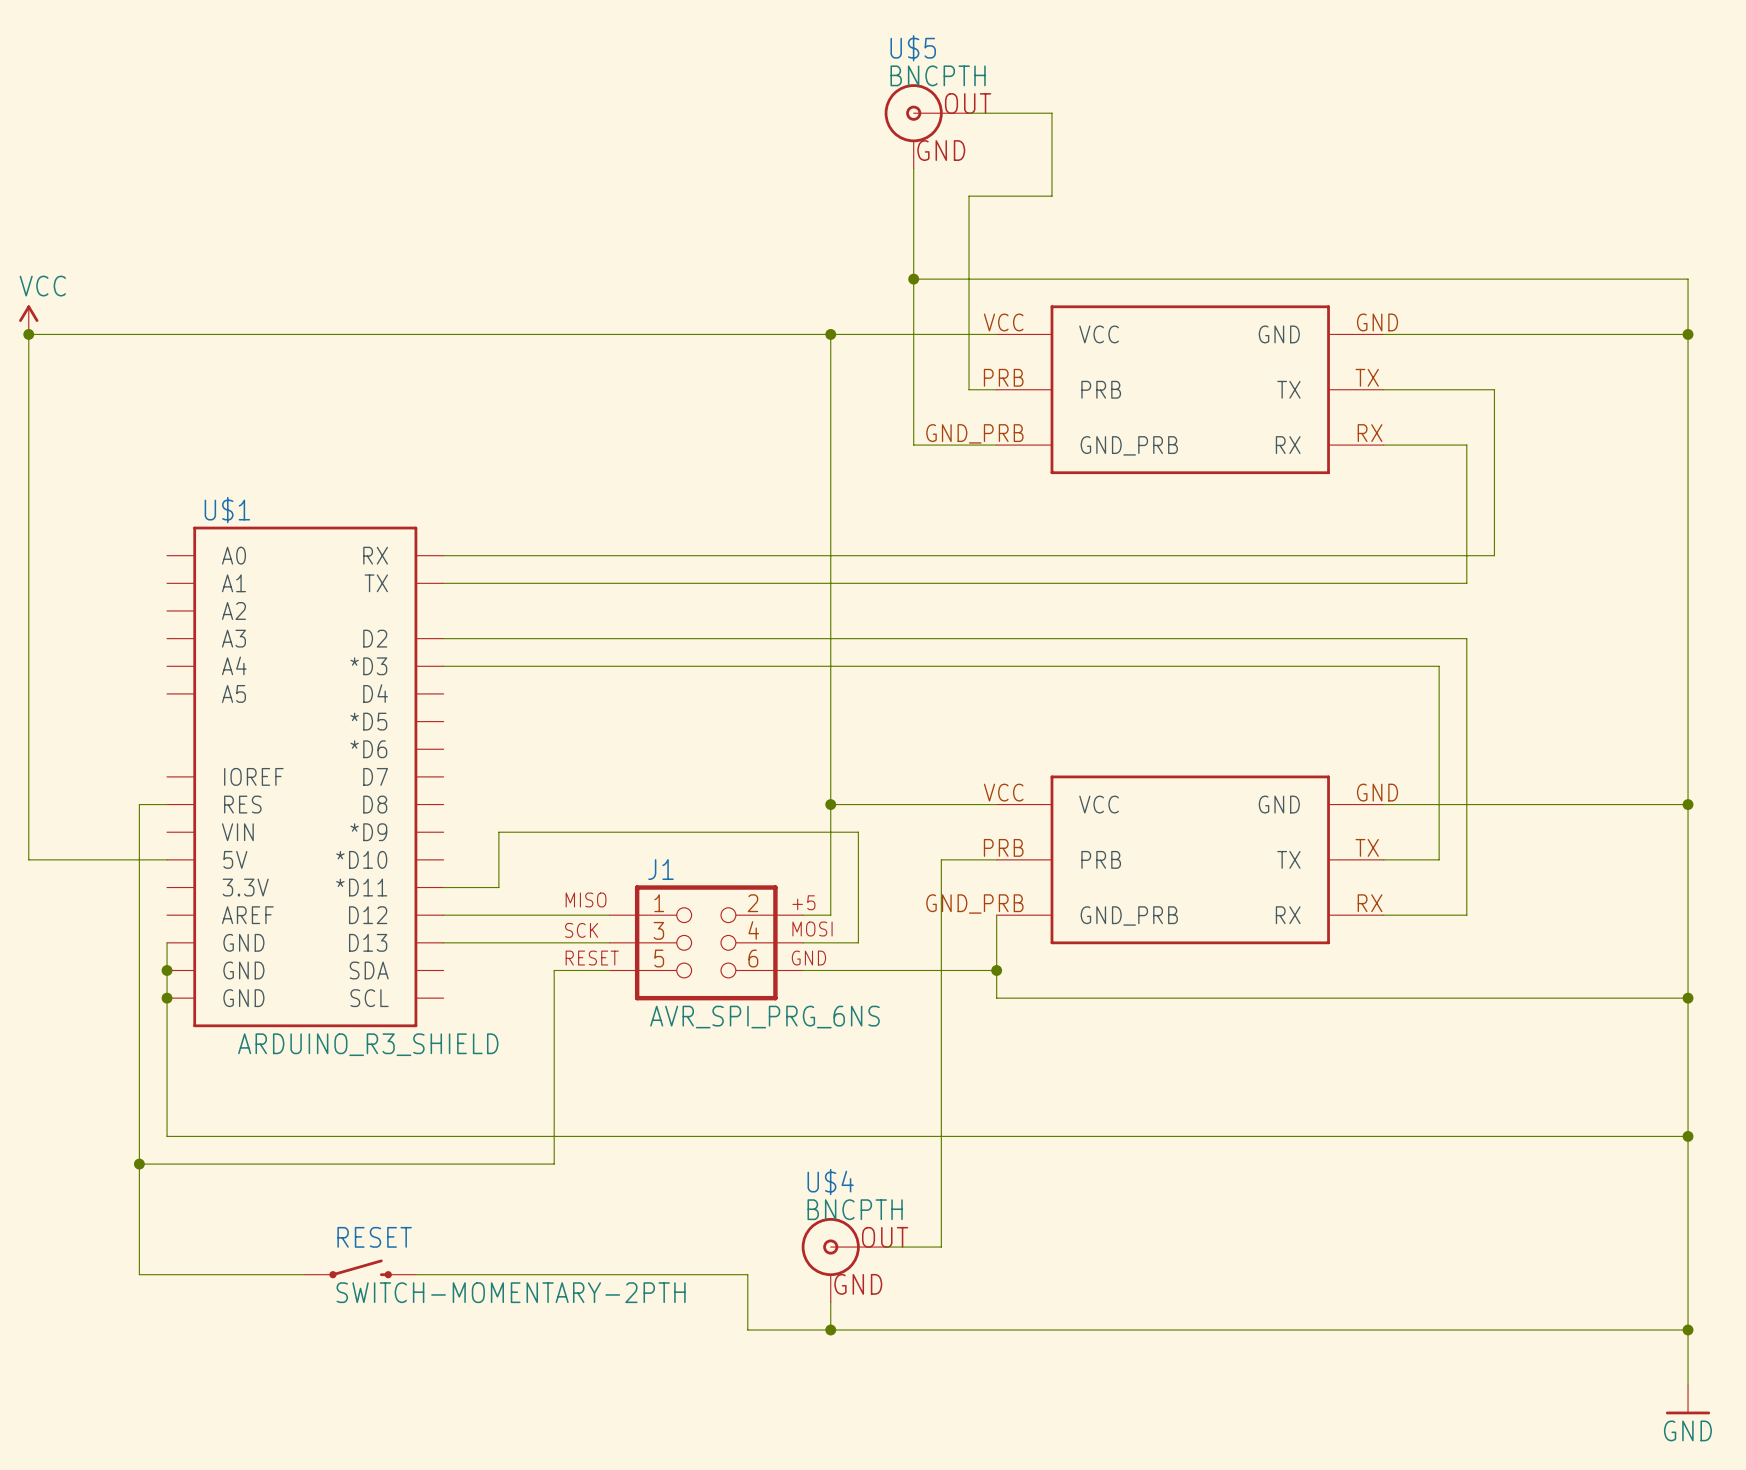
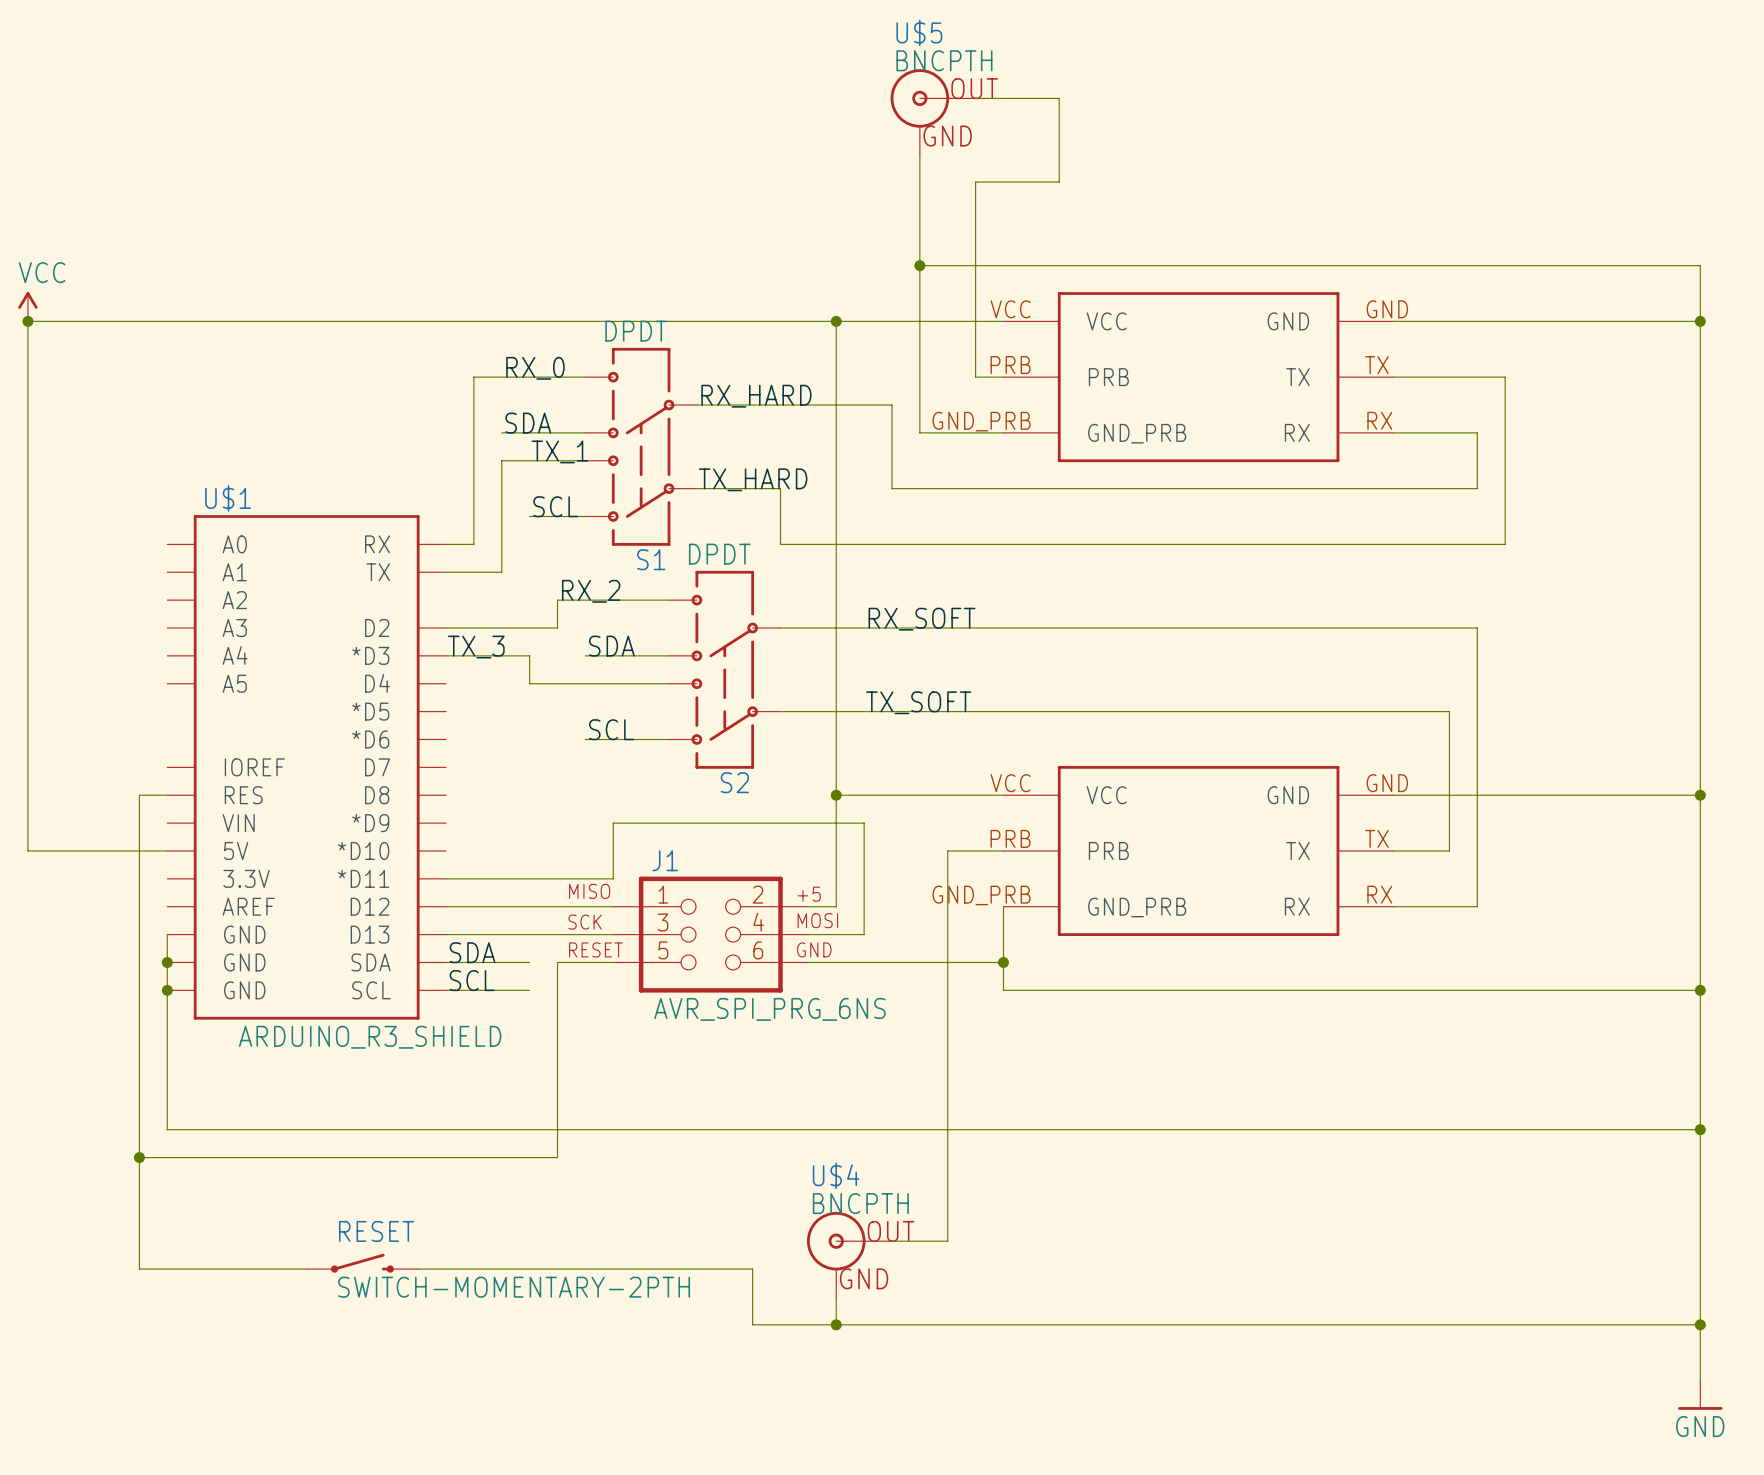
label: none -> RX_0 (535, 368)
wire: none -> (585, 377) (473, 377) (473, 544)
label: none -> RX_HARD (756, 396)
label: none -> SDA (528, 423)
wire: none -> (501, 432) (585, 432)
S1: none -> DPDT (641, 446)
label: none -> TX_1 (559, 451)
wire: none -> (585, 460) (501, 460) (501, 572)
label: none -> TX_HARD (753, 479)
wire: (1466, 500) (1466, 583) (498, 583) -> (1477, 488) (891, 488) (891, 405) (696, 405)
label: none -> SCL (555, 506)
wire: none -> (529, 516) (585, 516)
wire: (471, 555) (775, 555) -> (696, 488) (780, 488) (780, 544)
label: none -> RX_2 (591, 591)
label: none -> RX_SOFT (922, 619)
wire: (554, 638) (775, 638) -> (557, 628) (557, 600) (669, 600)
label: none -> SDA (611, 646)
label: none -> TX_3 (476, 647)
wire: (526, 666) (581, 666) -> (529, 655) (529, 683) (669, 683)
wire: (664, 666) (1439, 666) (1439, 721) -> (780, 711) (1449, 711)
S2: none -> DPDT (724, 669)
label: none -> TX_SOFT (918, 702)
label: none -> SCL (611, 729)
wire: none -> (585, 739) (669, 739)
wire: (609, 832) (498, 832) (498, 887) -> (613, 823) (613, 878) (501, 878)
label: none -> SDA (472, 952)
wire: none -> (446, 962) (529, 962)
label: none -> SCL (472, 980)
wire: none -> (446, 990) (529, 990)

